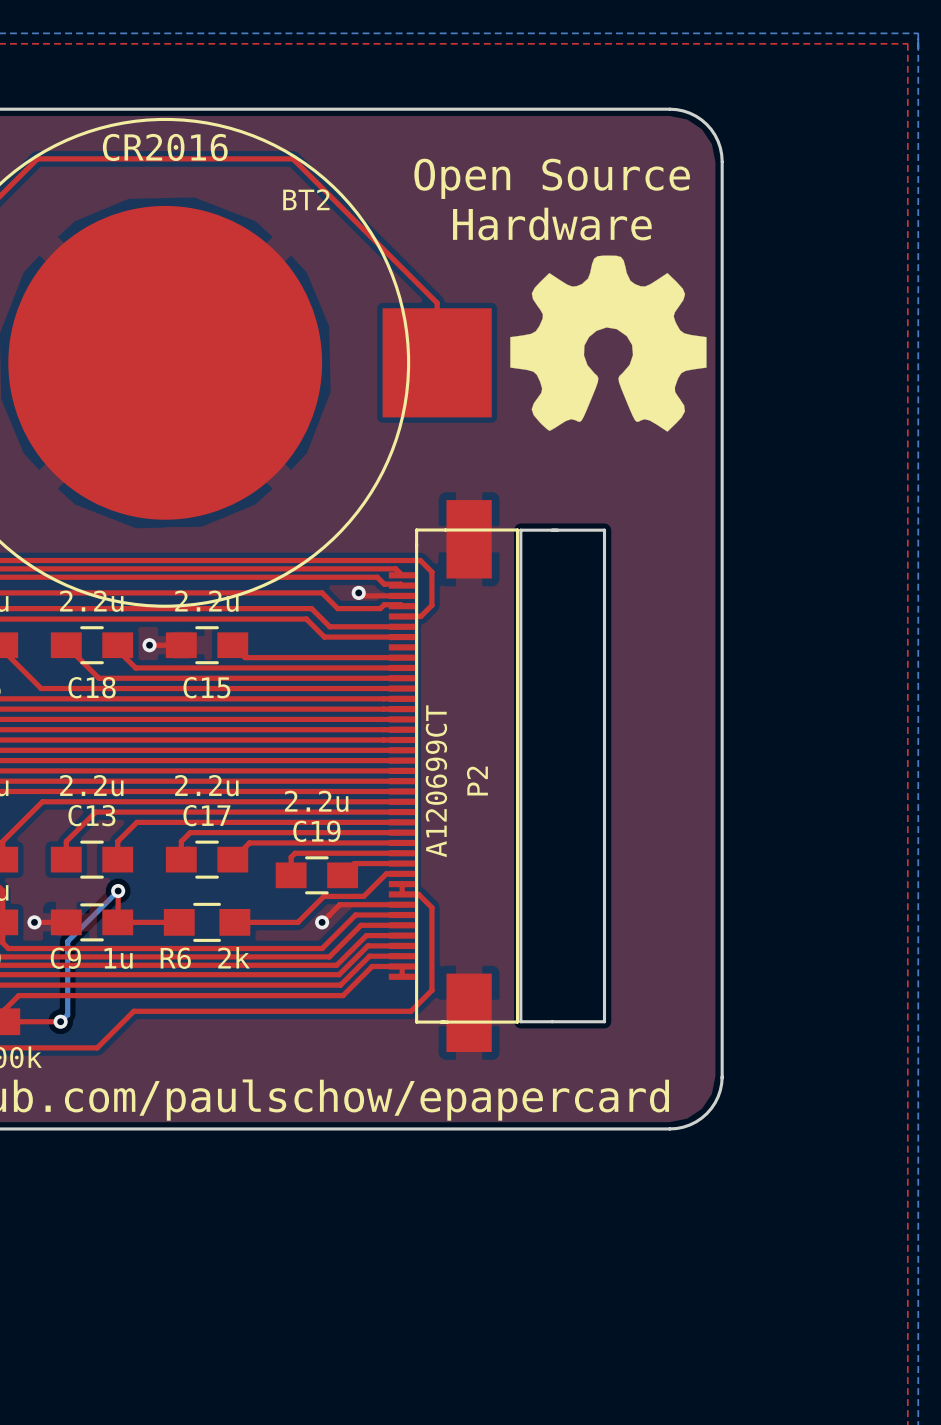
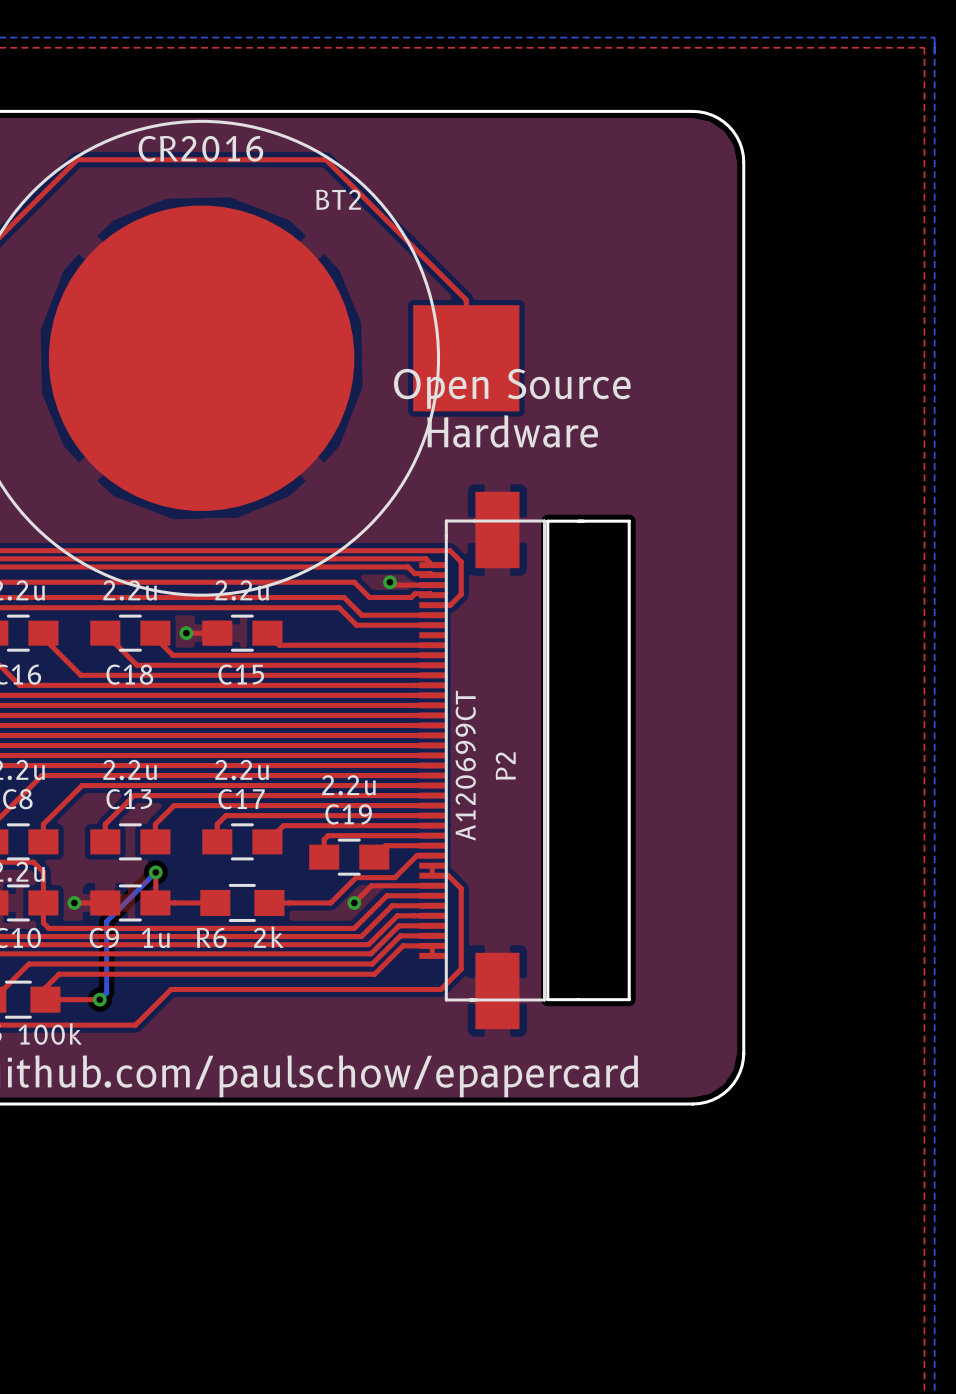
text position: Open Source (552, 178) -> Open Source (512, 388)
text position: Hardware (552, 224) -> Hardware (512, 431)
drawing: [510, 255, 707, 432] -> none

